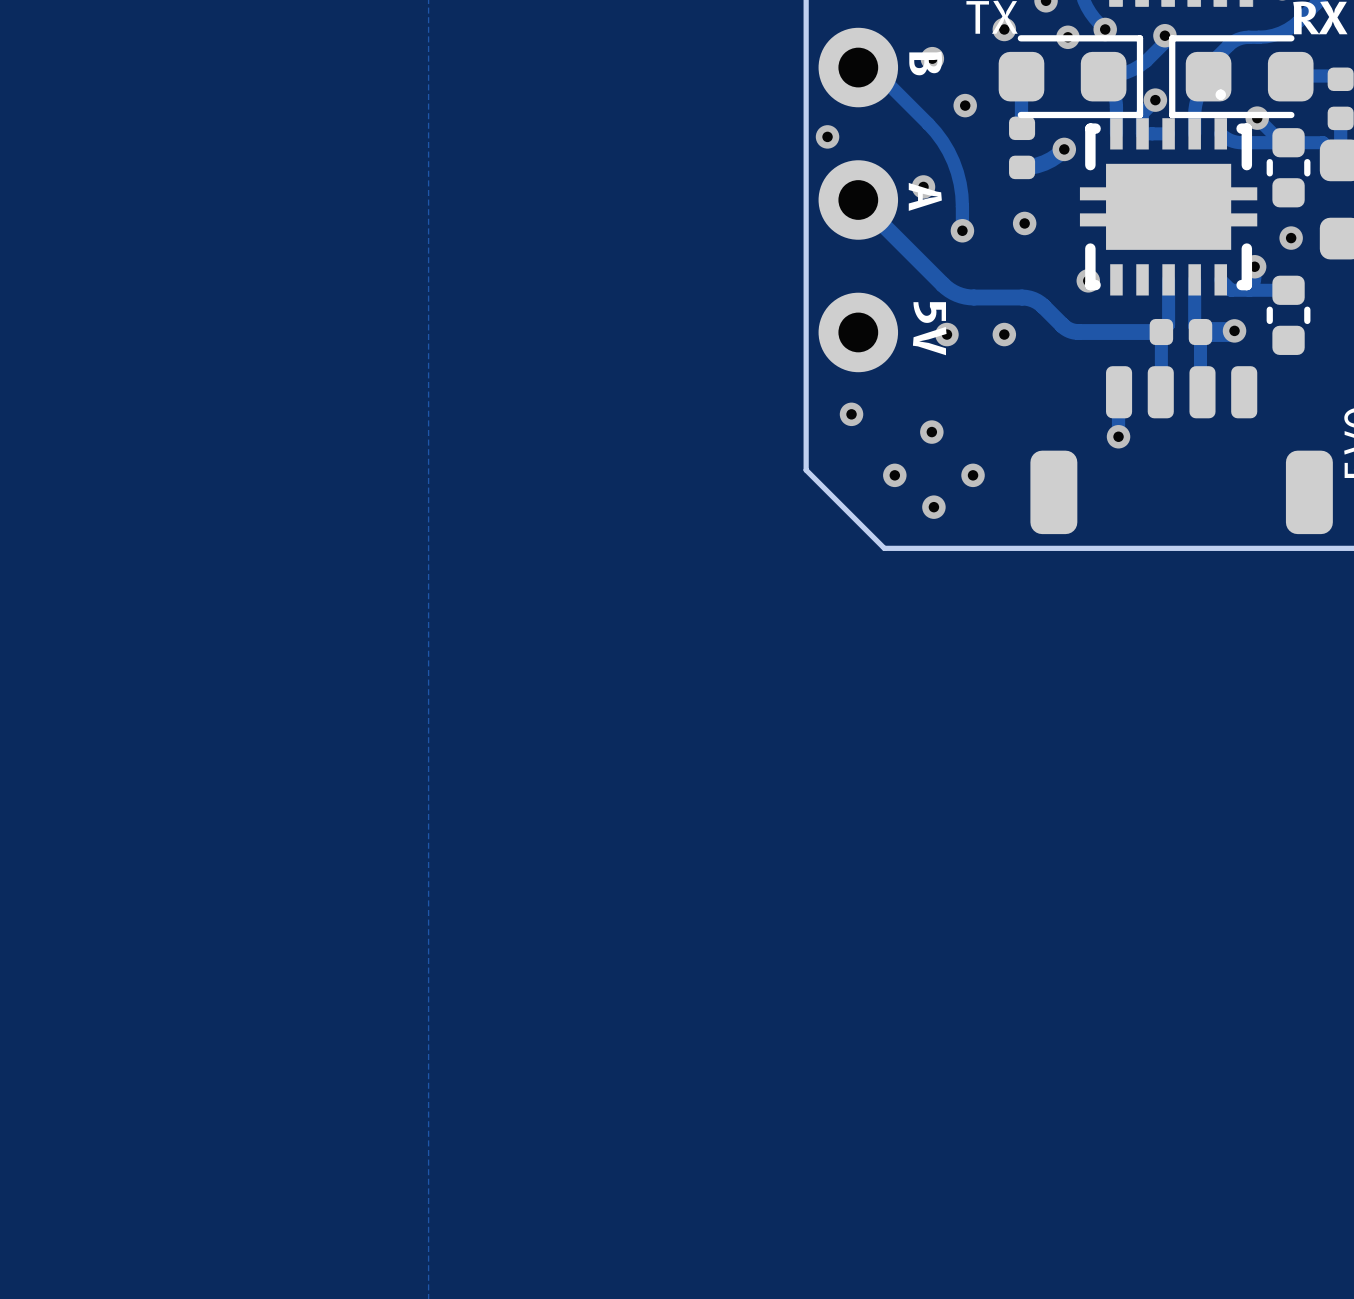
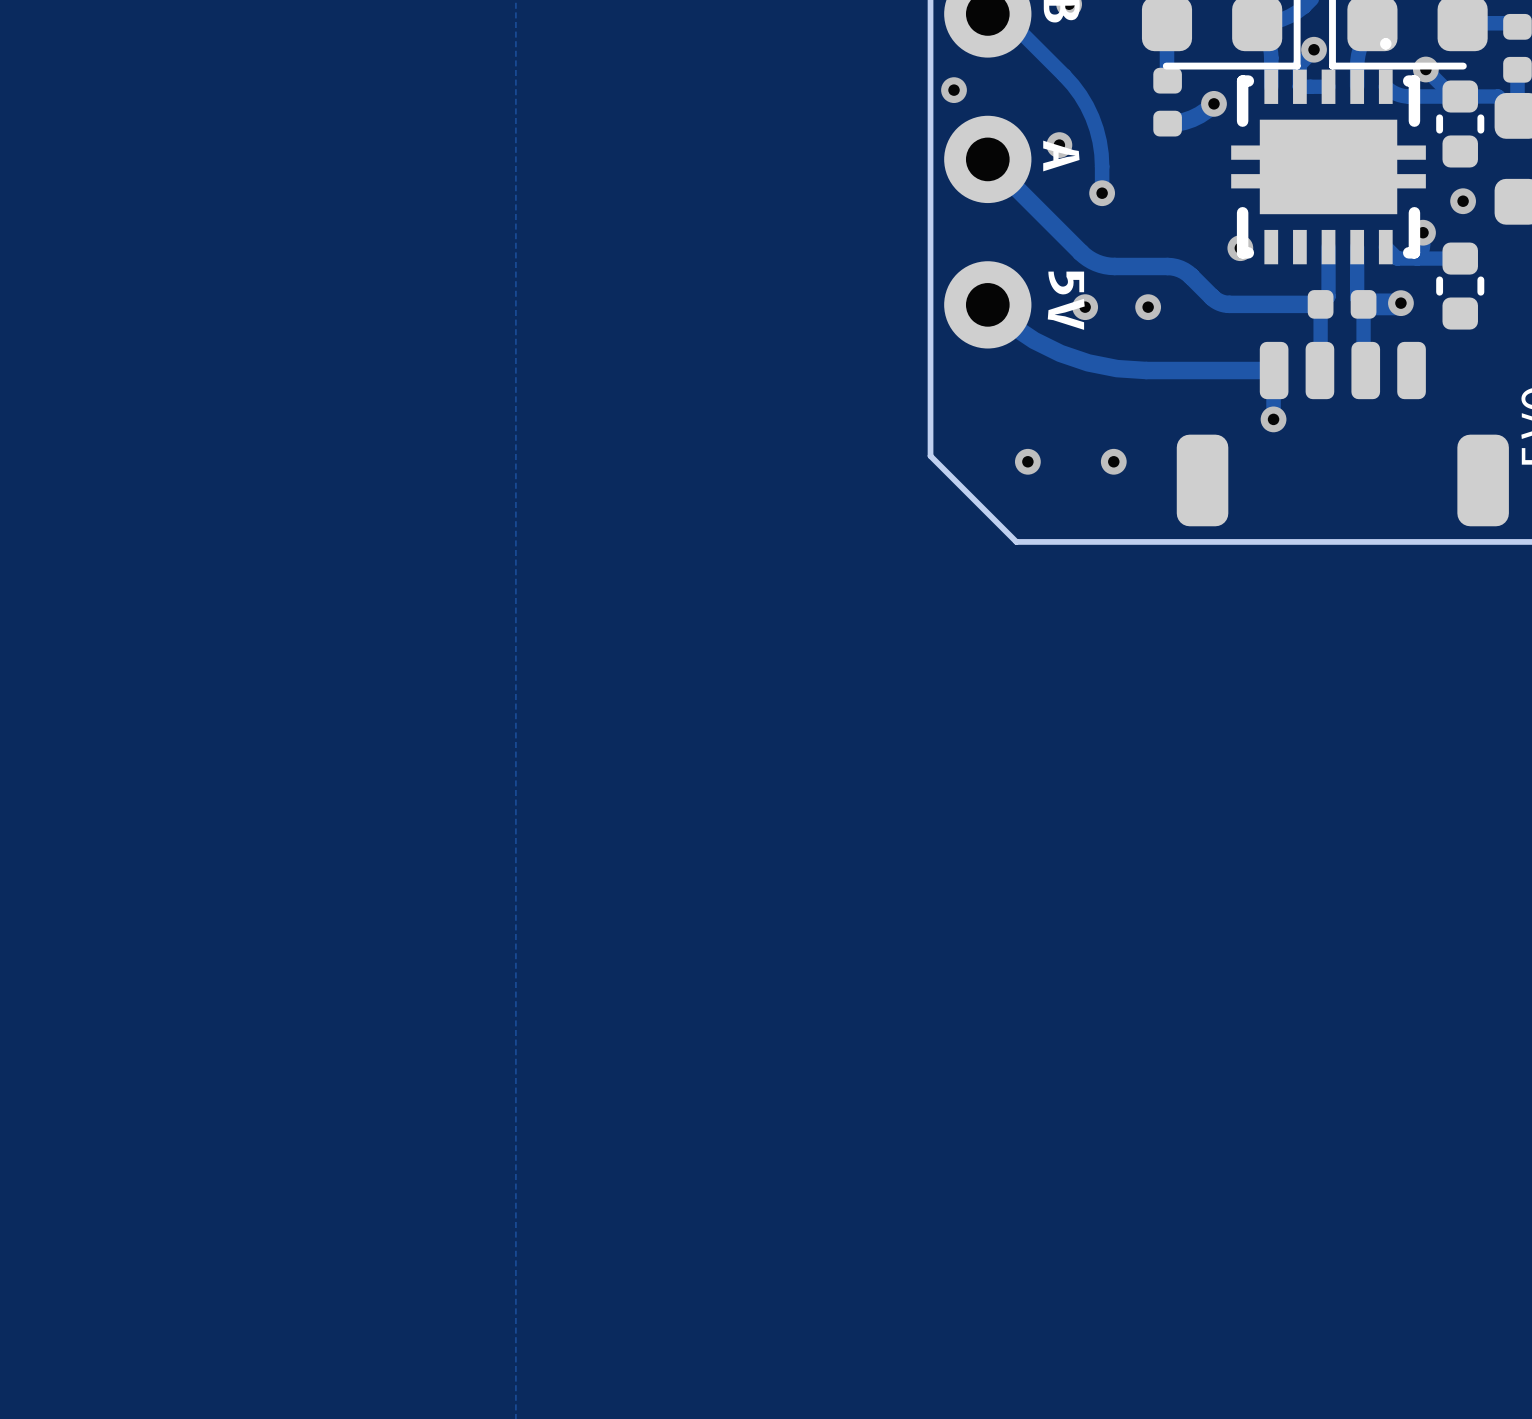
via: (965, 105) -> none
via: (1024, 223) -> none
track: none -> (987, 304) (1009, 324) (1034, 340) (1060, 353) (1088, 362) (1117, 368) (1146, 370) (1274, 370)
via: (851, 414) -> none
via: (931, 432) -> none
via: (933, 507) -> none

